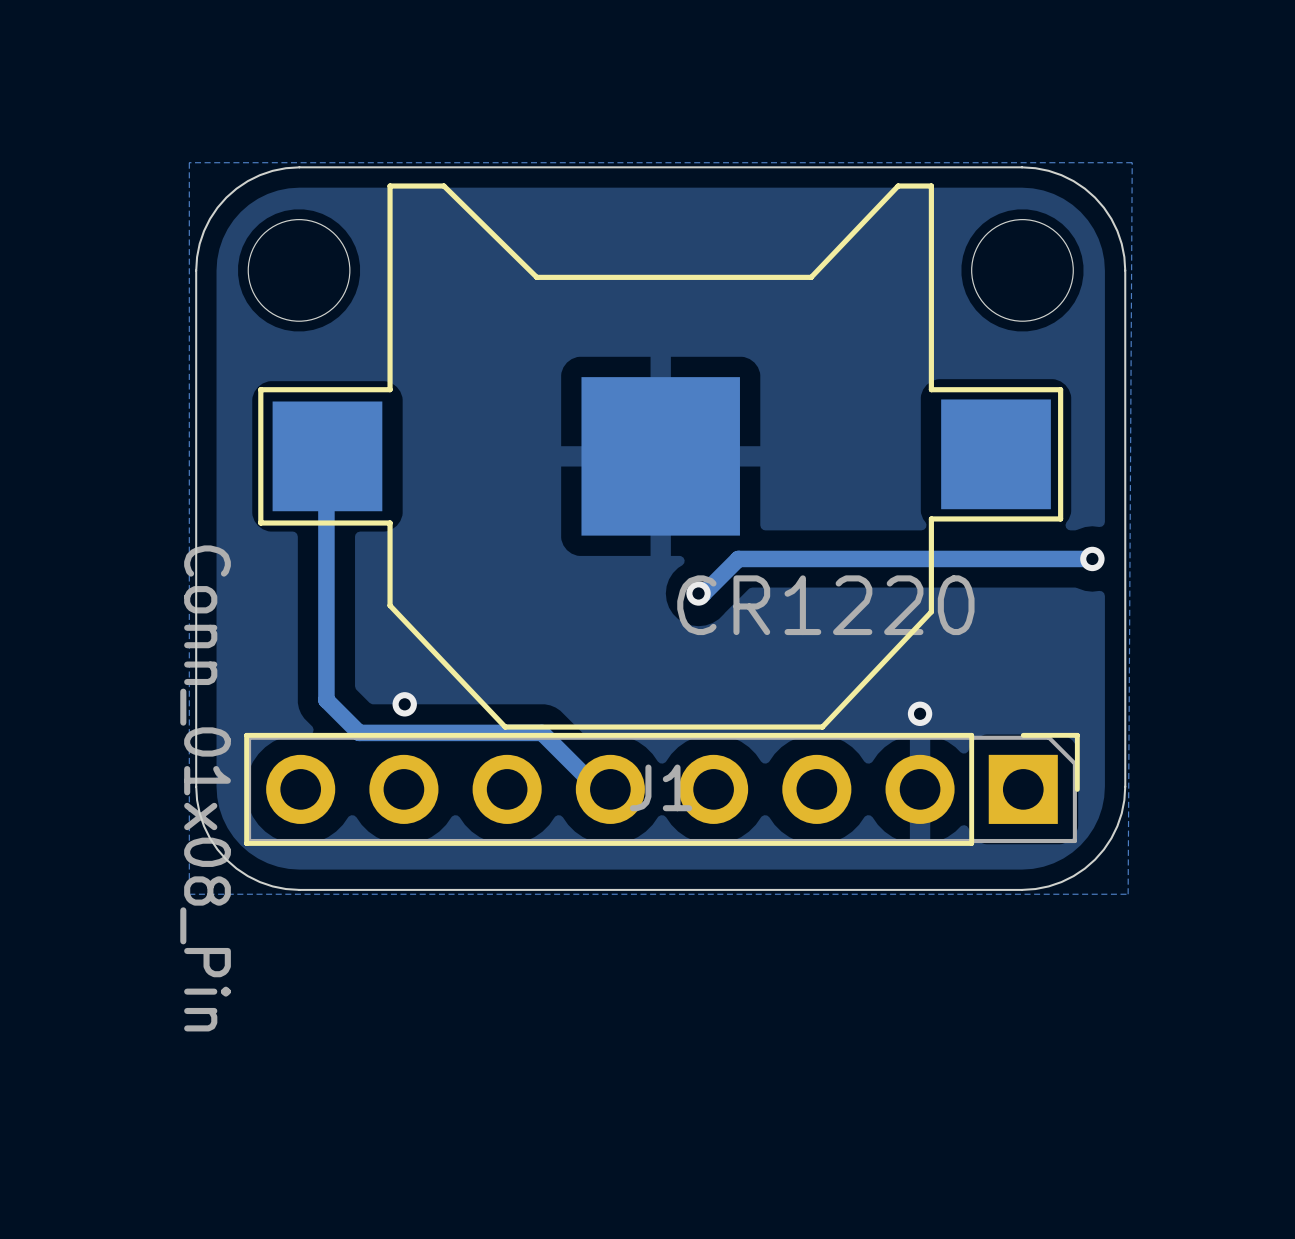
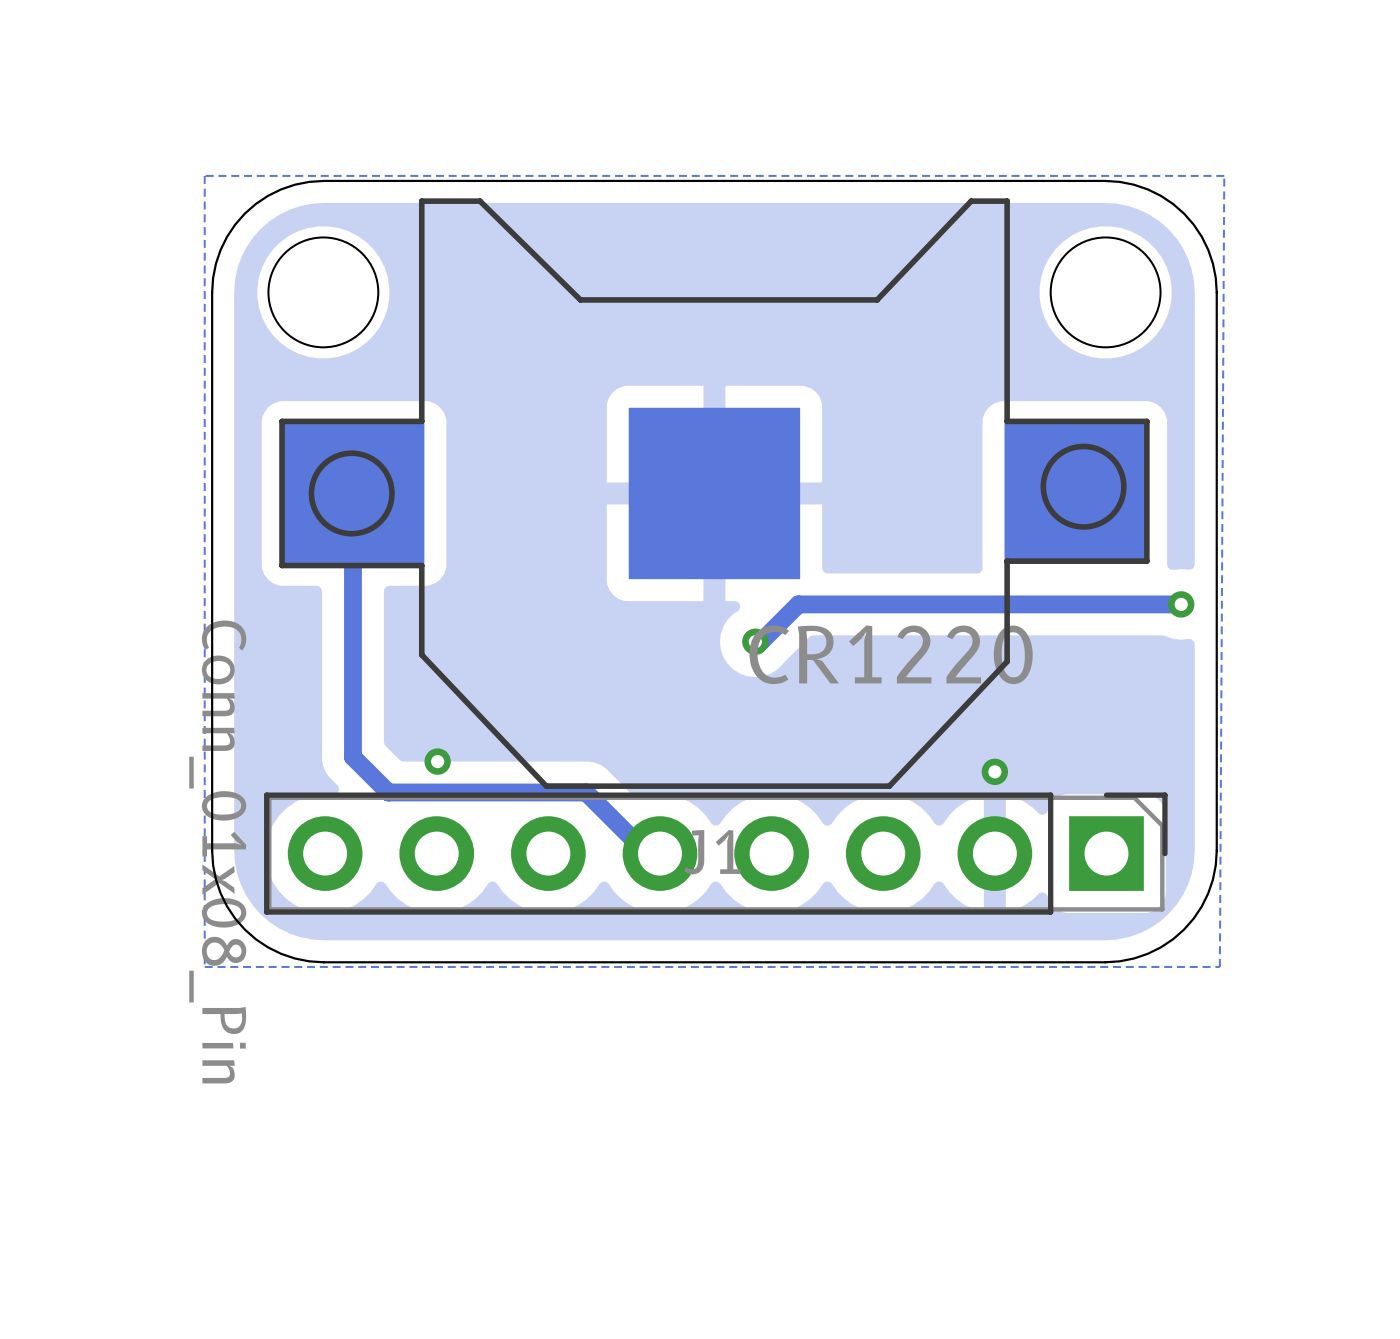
part footprint: [258, 183, 1064, 730] -> [279, 198, 1150, 789]

